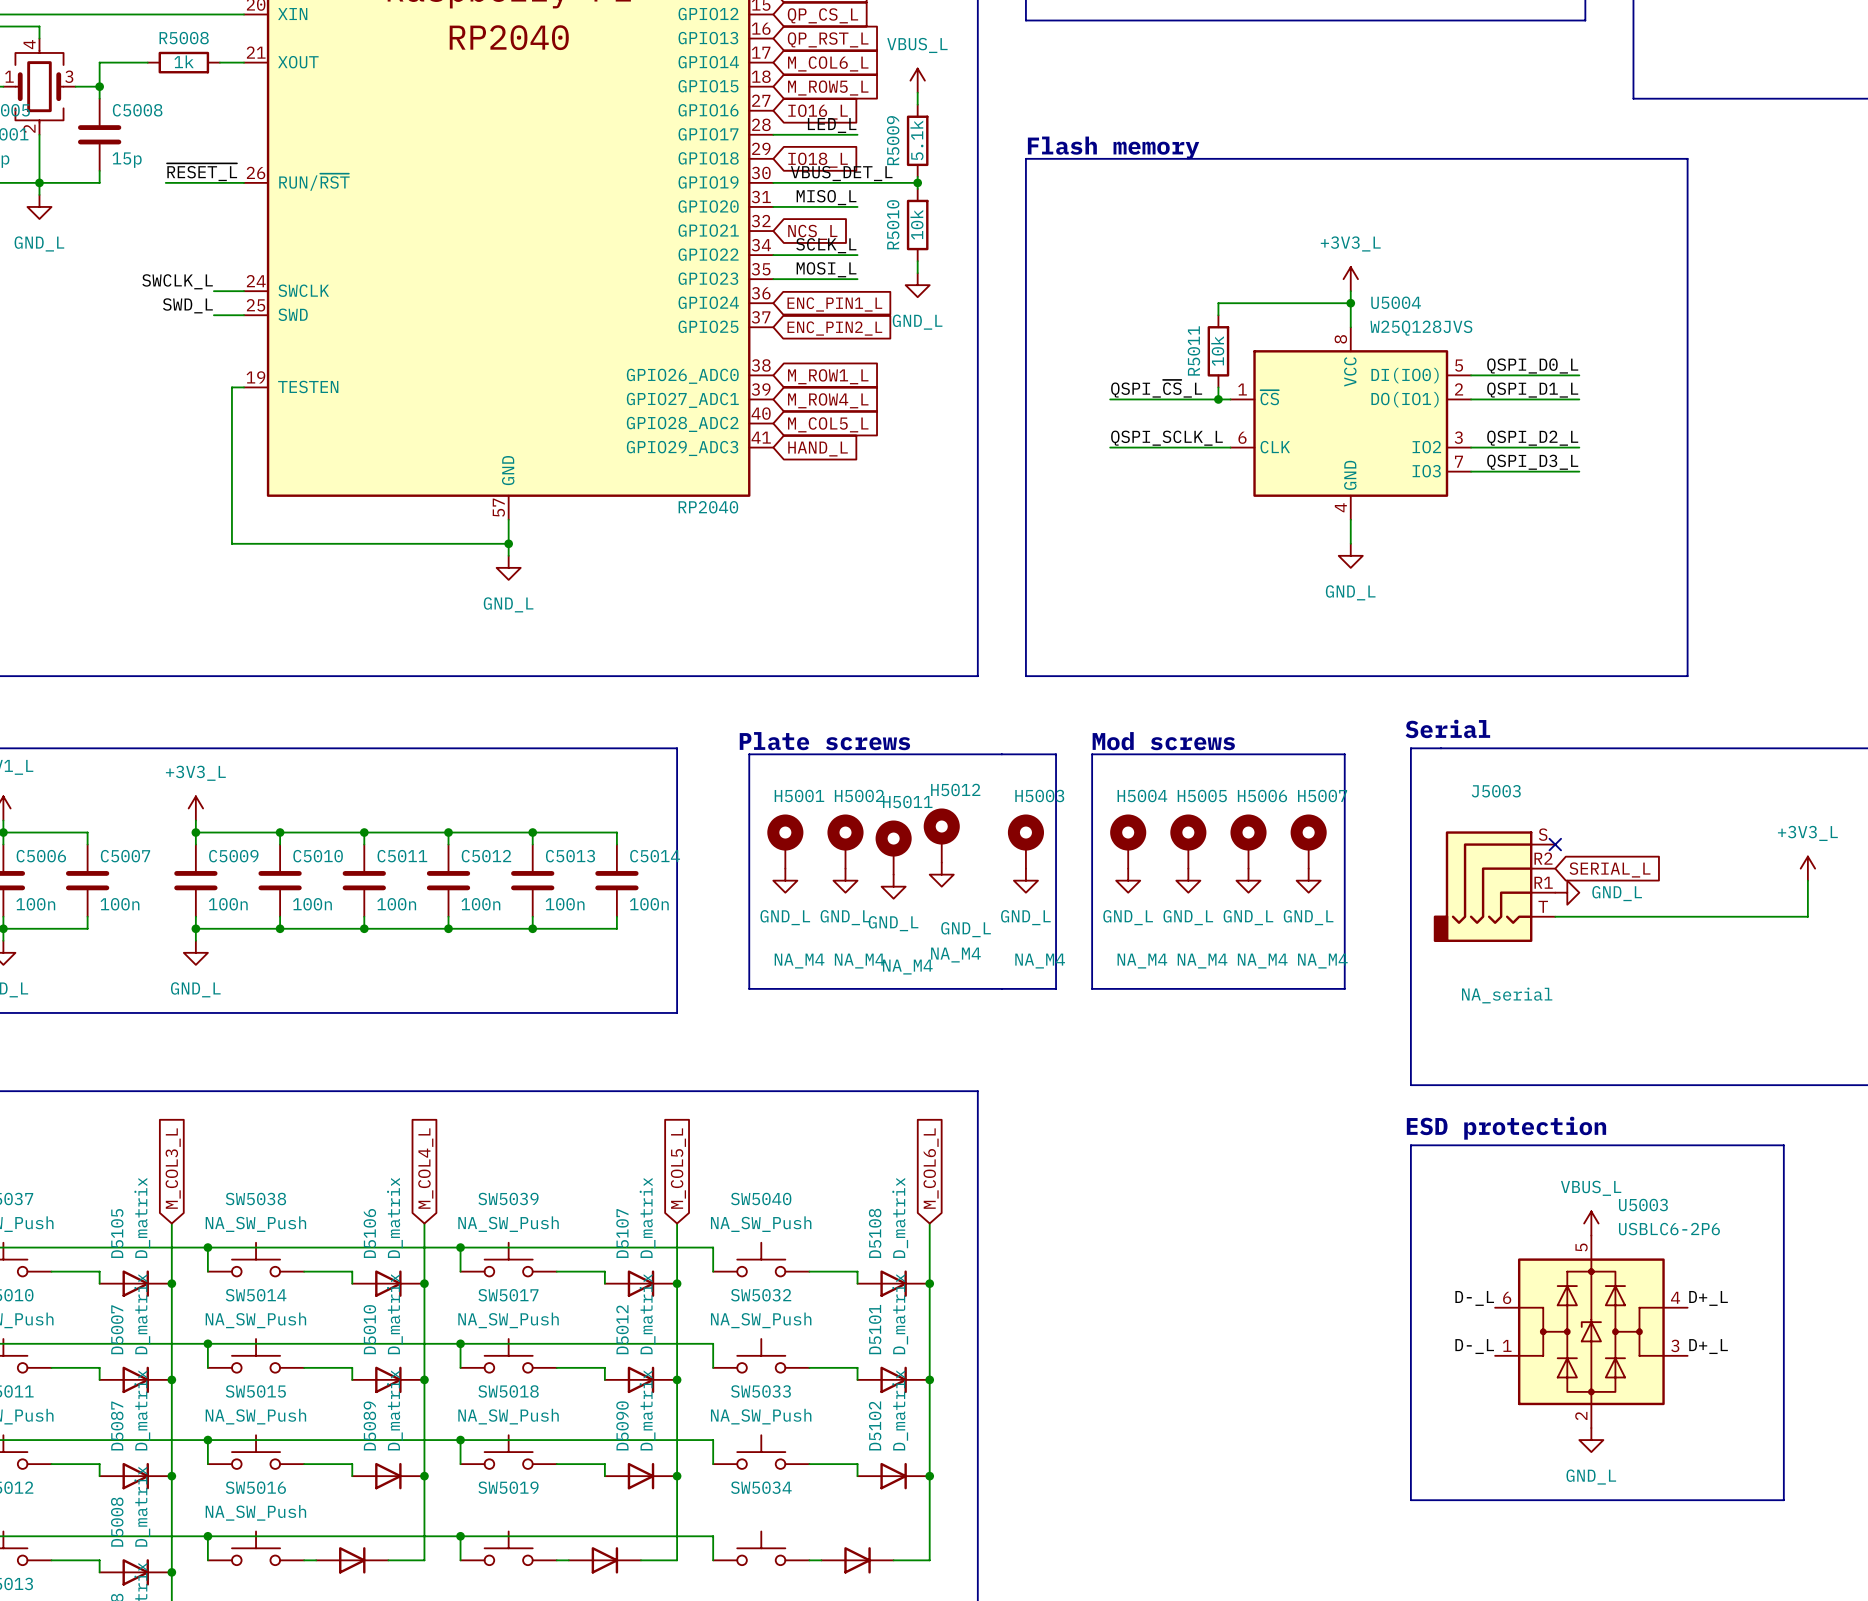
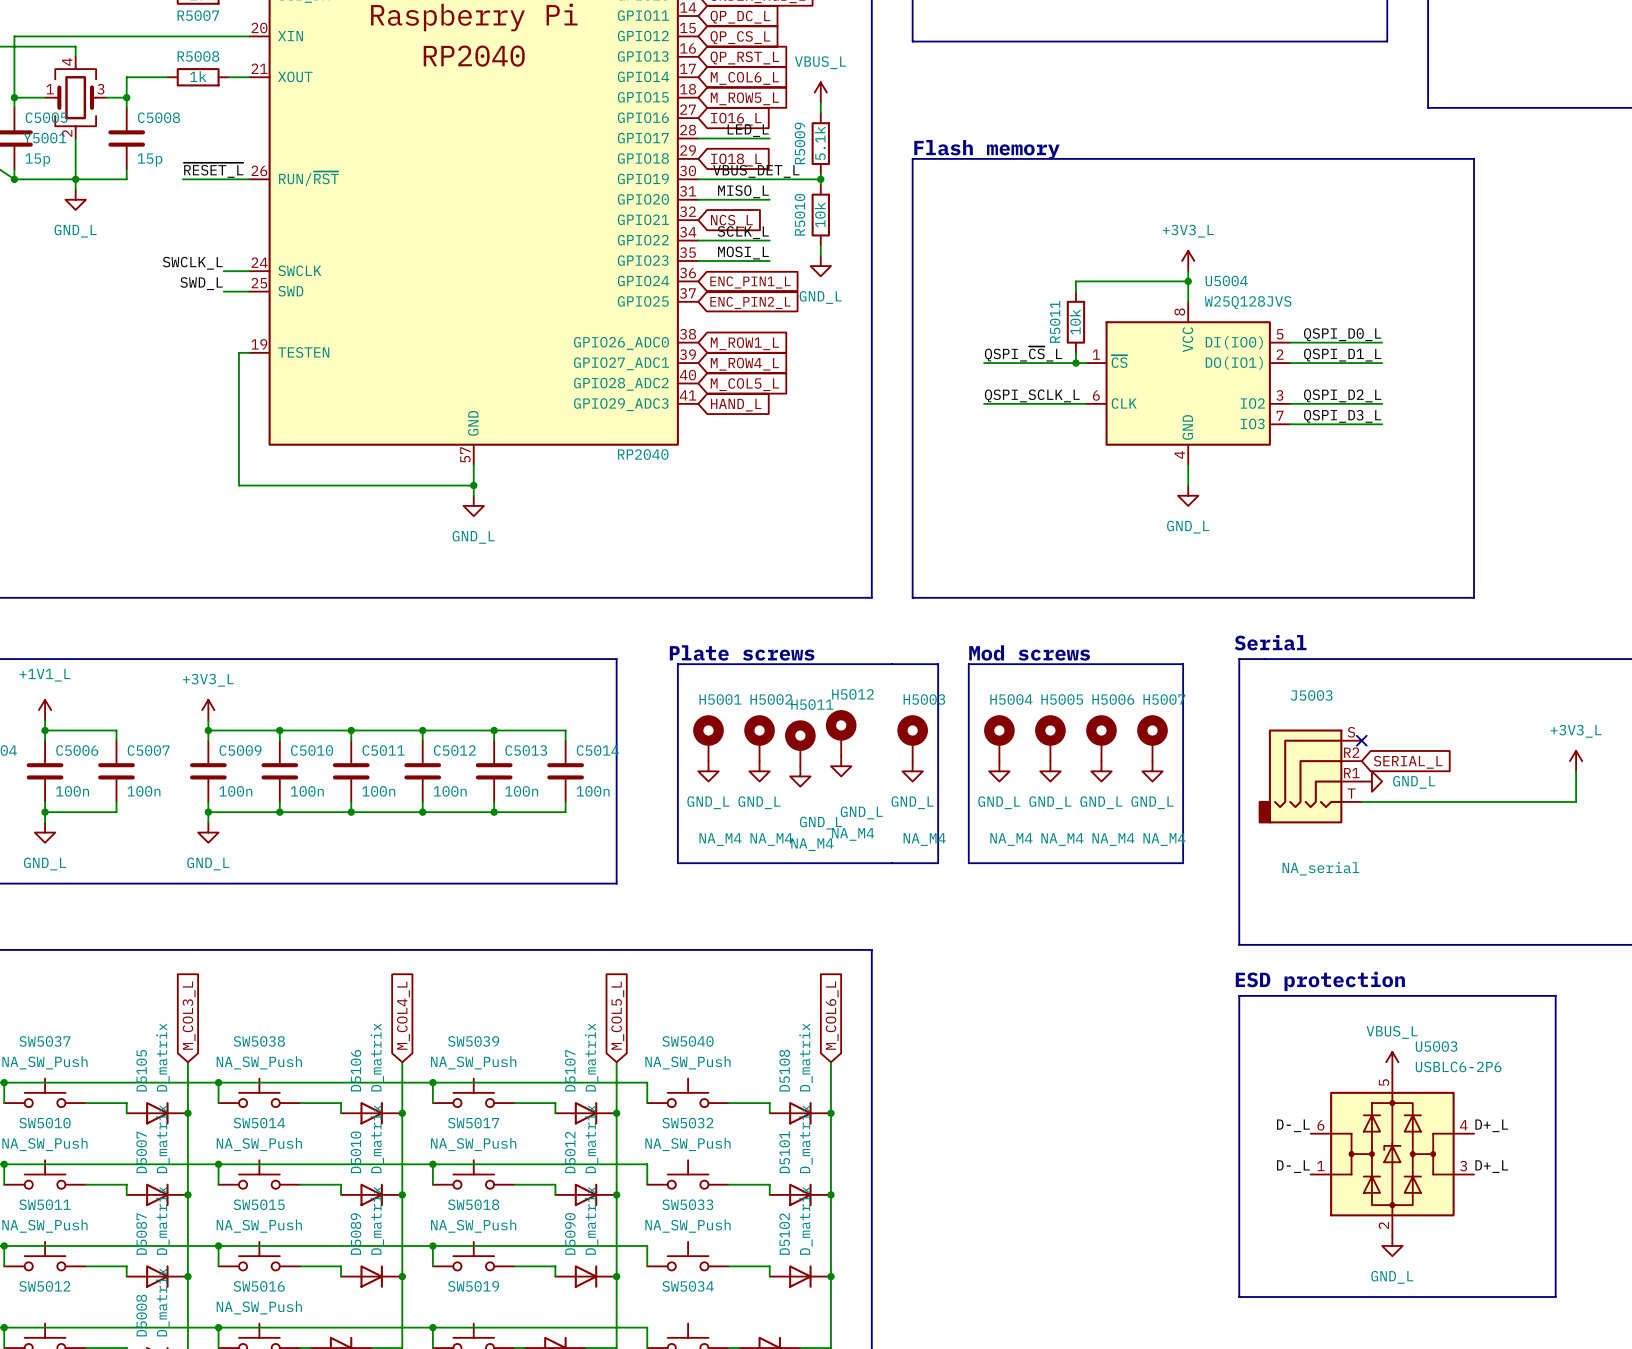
power symbol text position: GND_L (893, 923) -> GND_L (820, 823)

